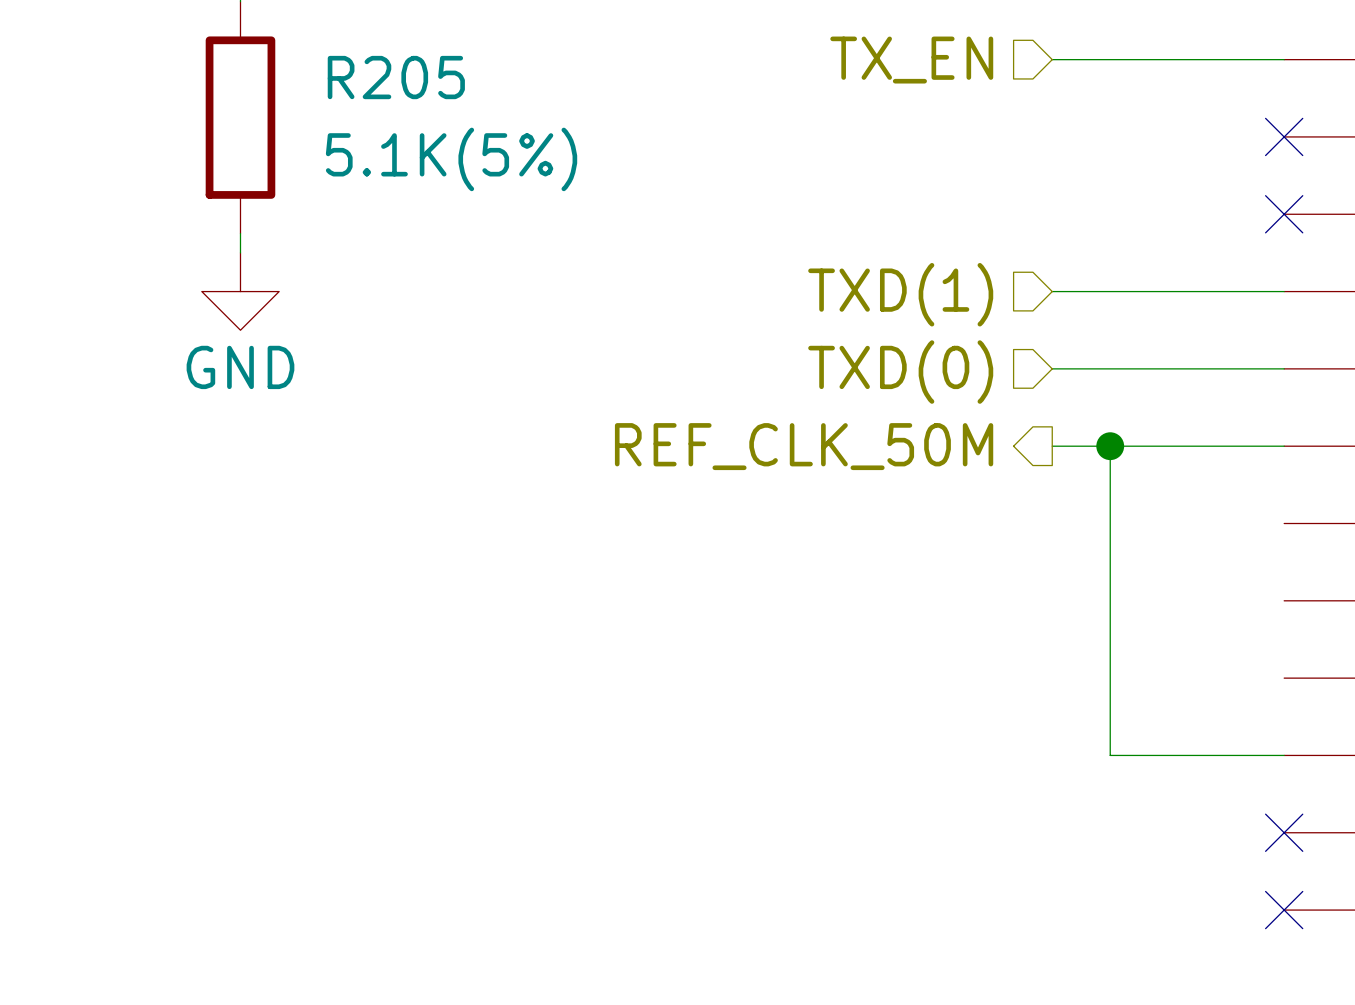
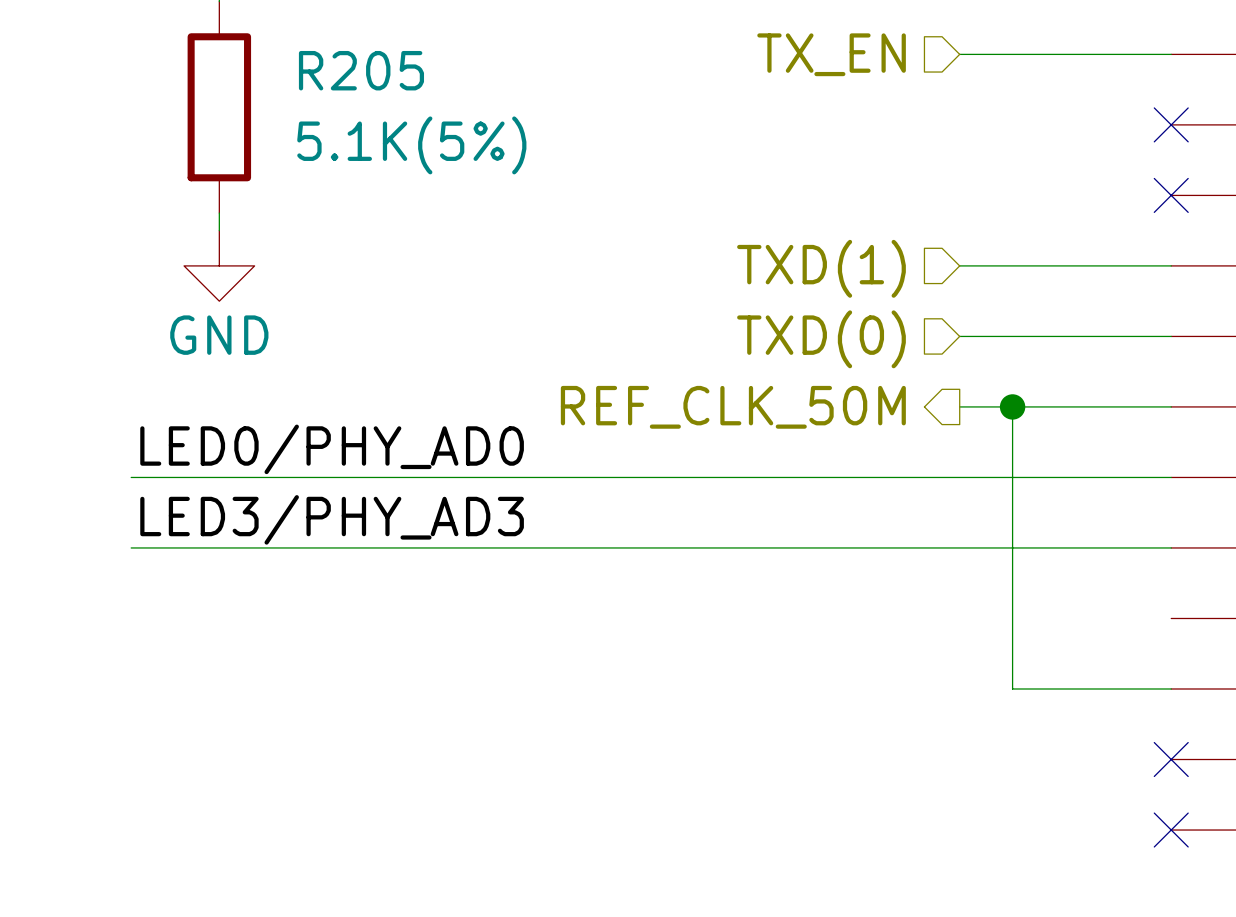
label: none -> LED0/PHY_AD0 (332, 449)
wire: none -> (131, 477) (1171, 477)
label: none -> LED3/PHY_AD3 (332, 519)
wire: none -> (131, 547) (1171, 547)

